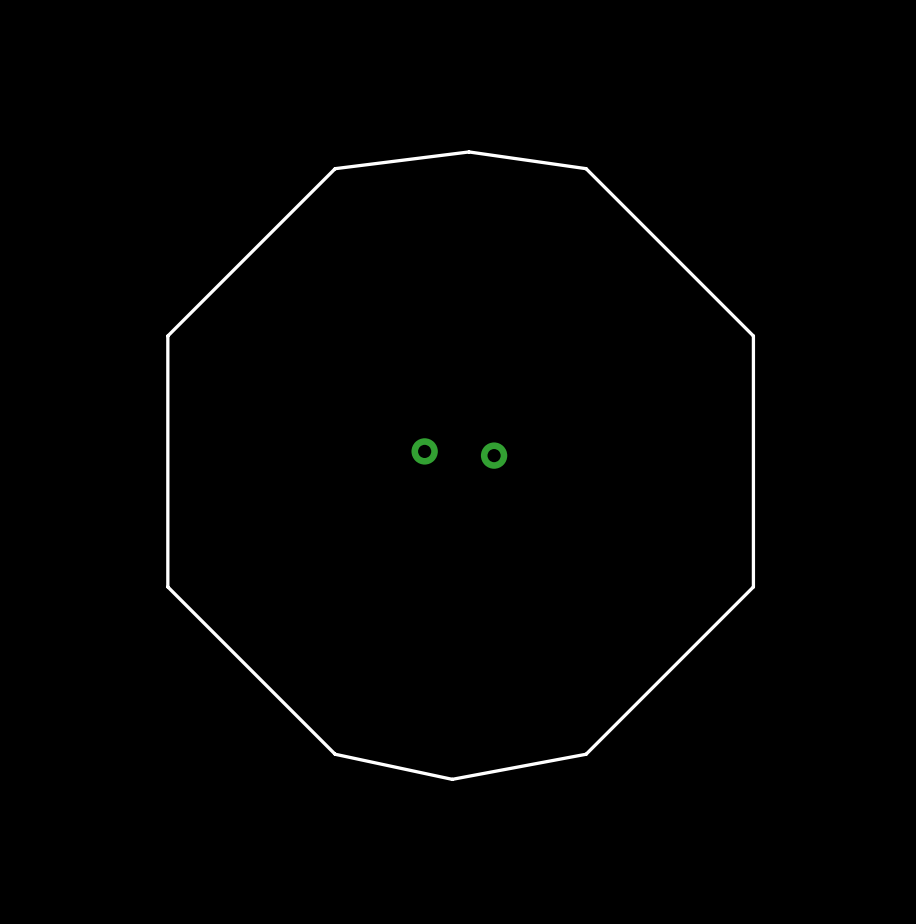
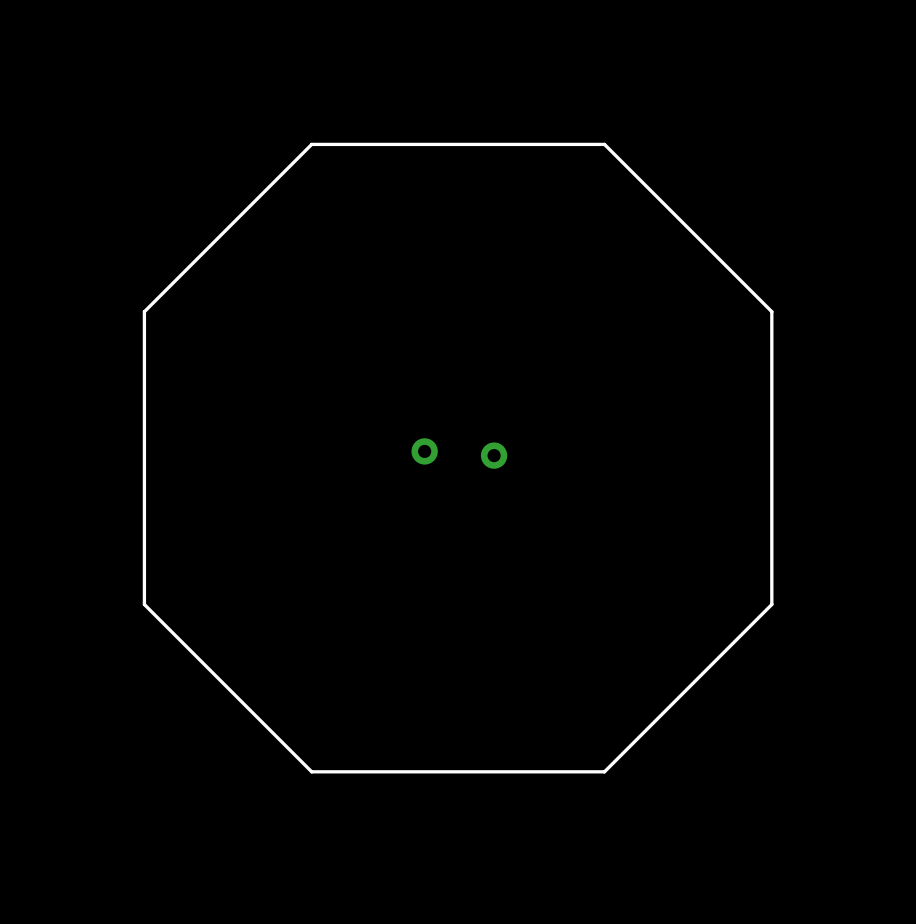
board edge: (468, 151) (335, 168) (167, 335) (167, 586) (335, 754) (452, 779) (586, 754) (753, 586) (753, 335) (586, 168) (468, 151) -> (604, 144) (771, 311) (771, 604) (604, 771) (311, 771) (144, 604) (144, 311) (311, 144) (604, 144)

